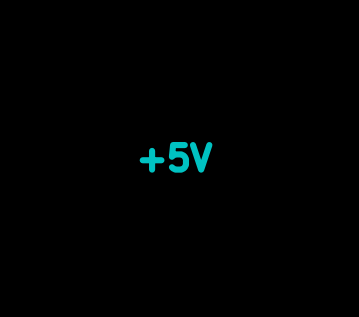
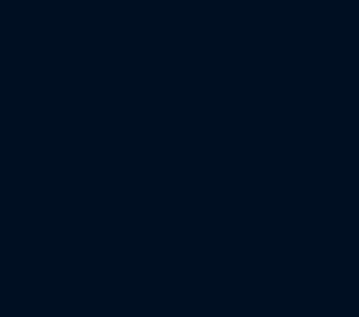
text: +5V (176, 157) -> none

